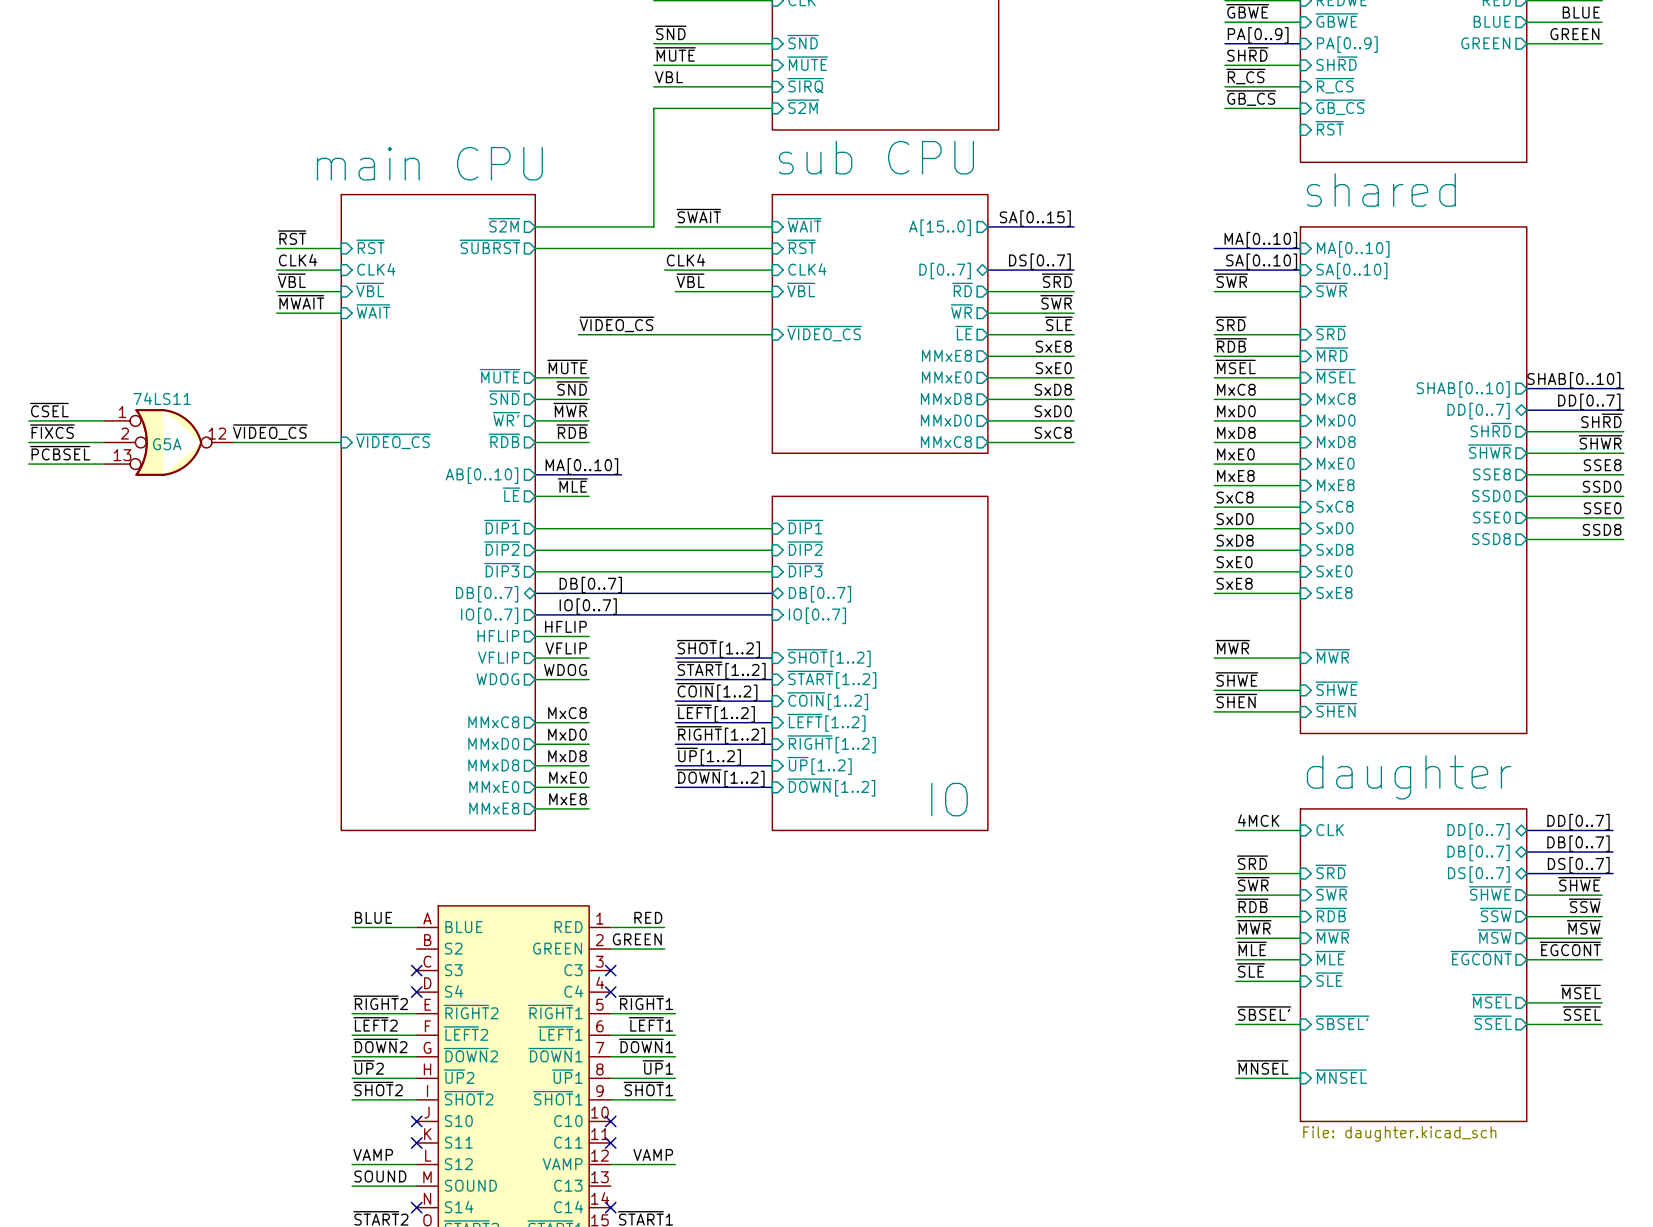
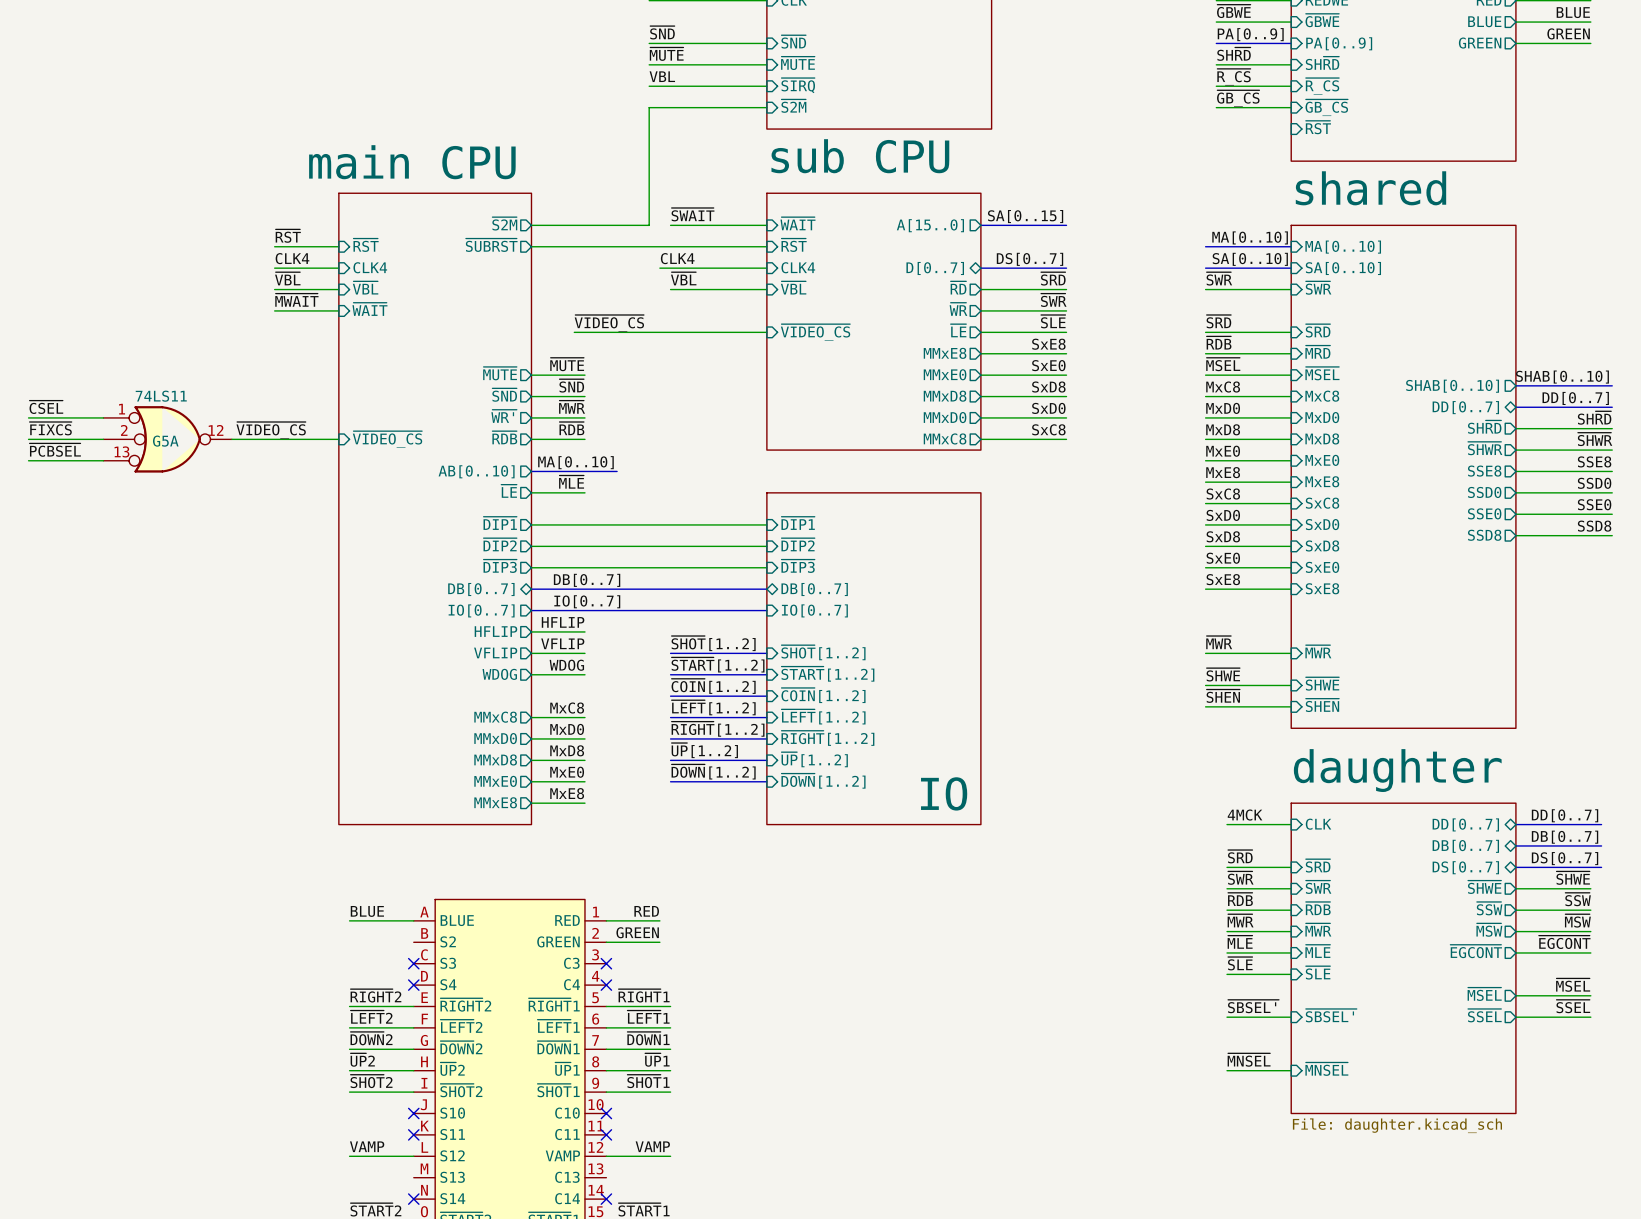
label: SOUND (380, 1176) -> none
part pin name: SOUND (470, 1185) -> S13 (452, 1177)
wire: (352, 1186) (416, 1186) -> none

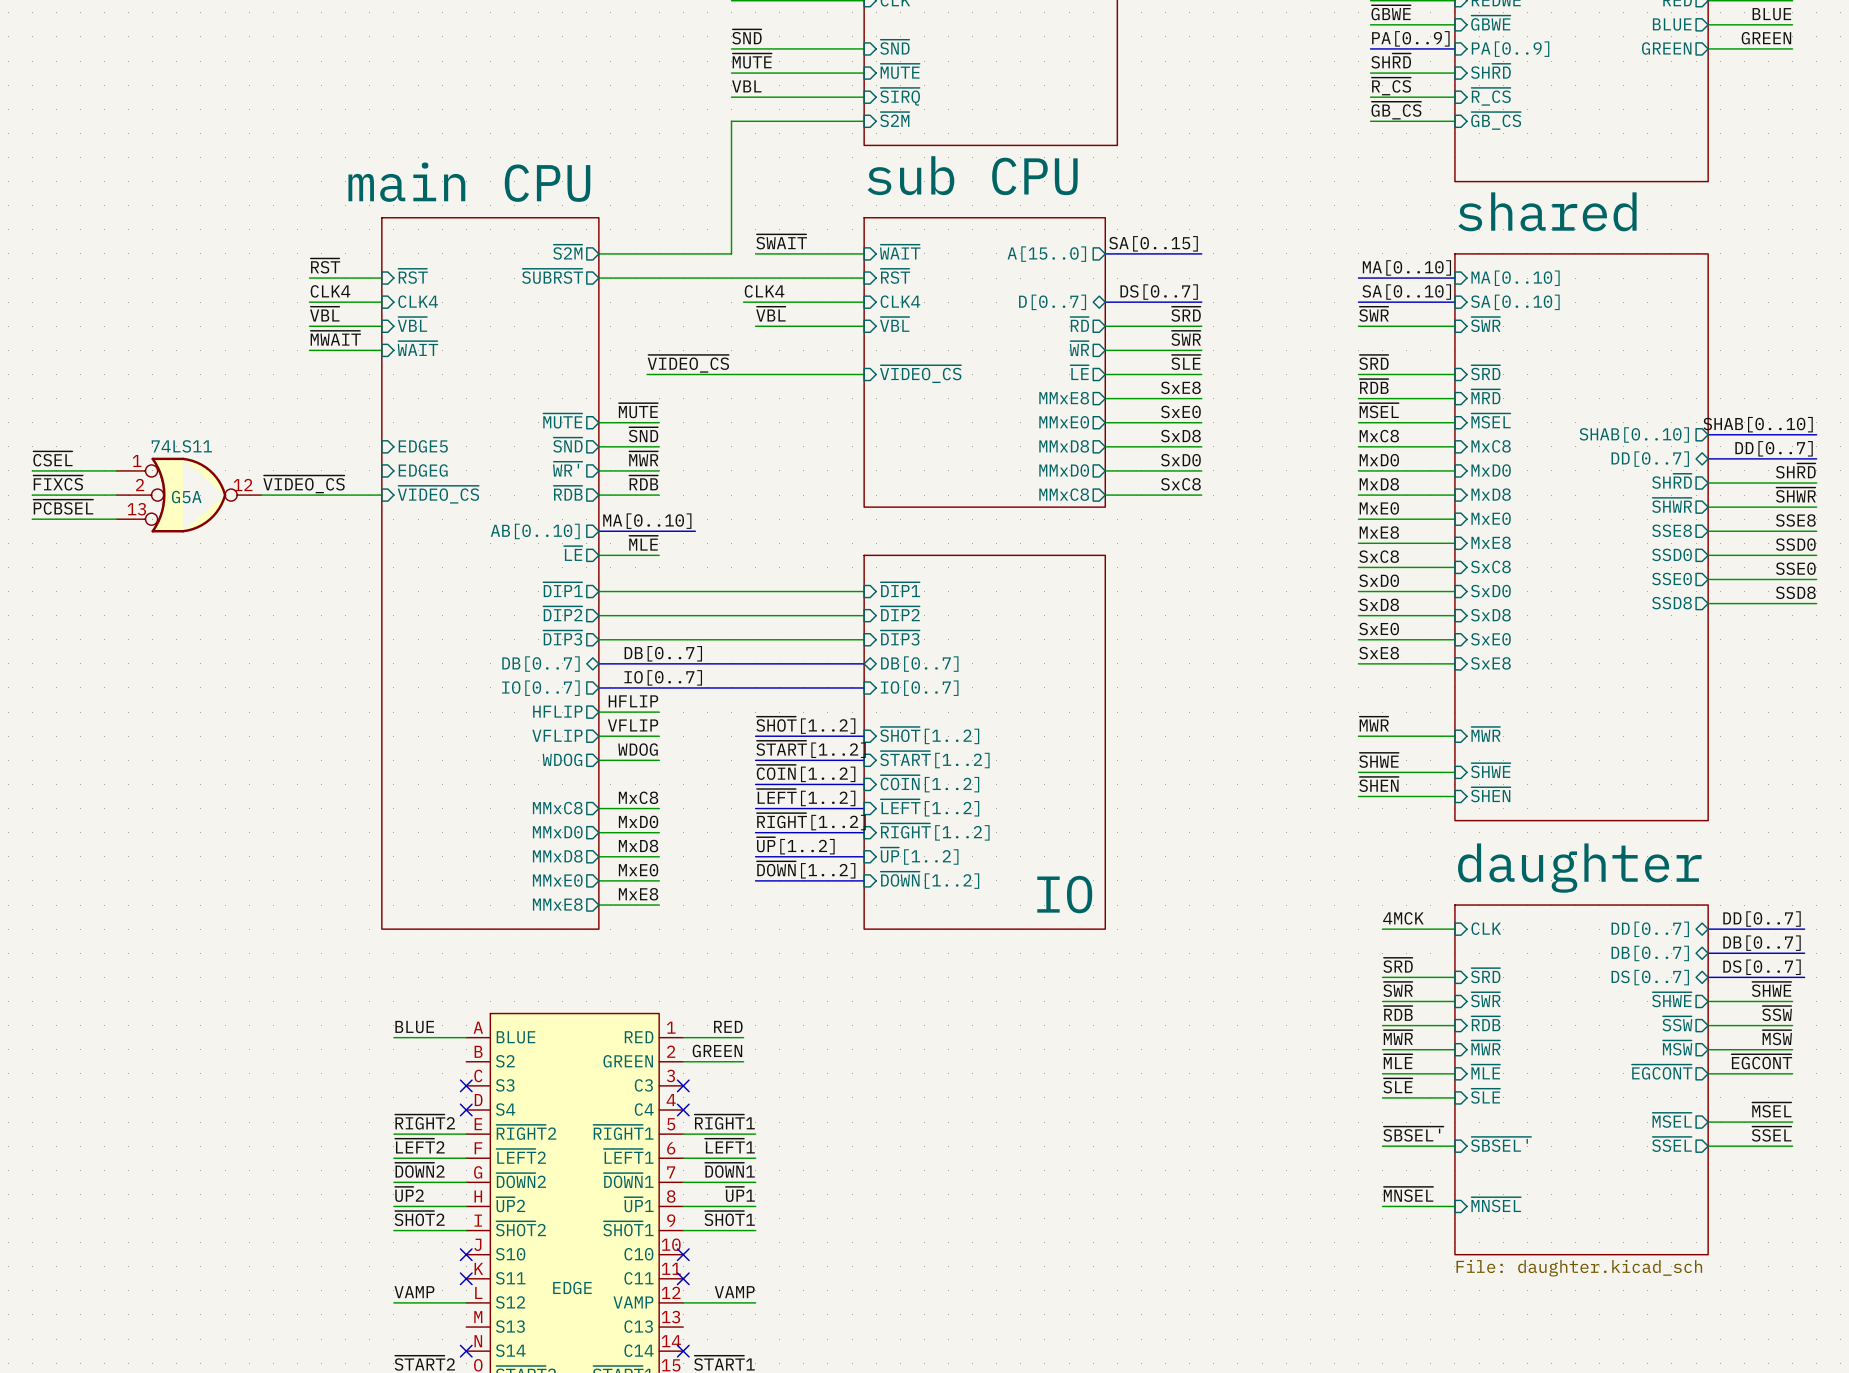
sheet pin: ~{RST} (1318, 127) -> none
sheet pin: none -> EDGE5 (423, 446)
sheet pin: none -> EDGEG (423, 470)
EDGE name: none -> EDGE (572, 1287)

